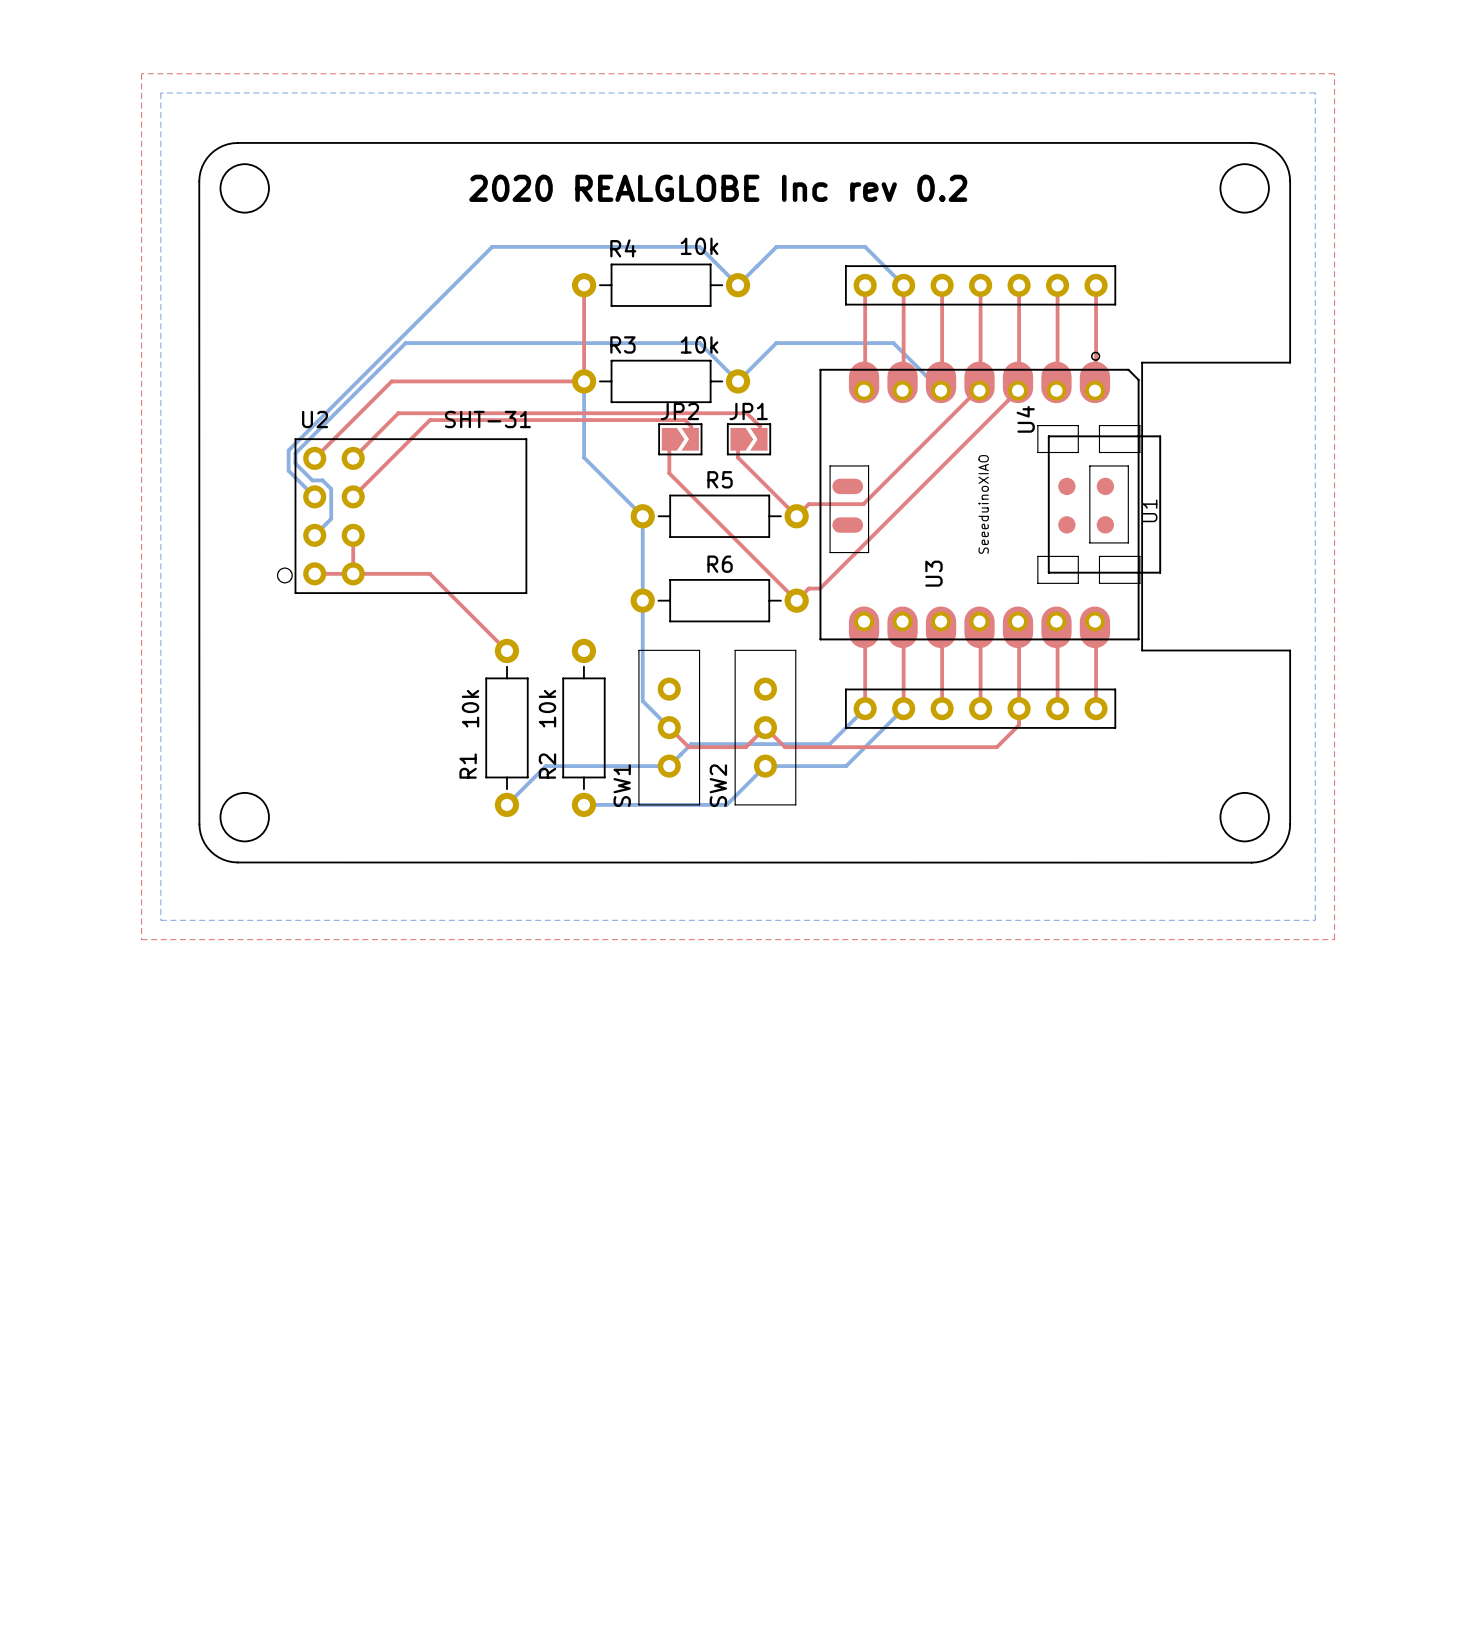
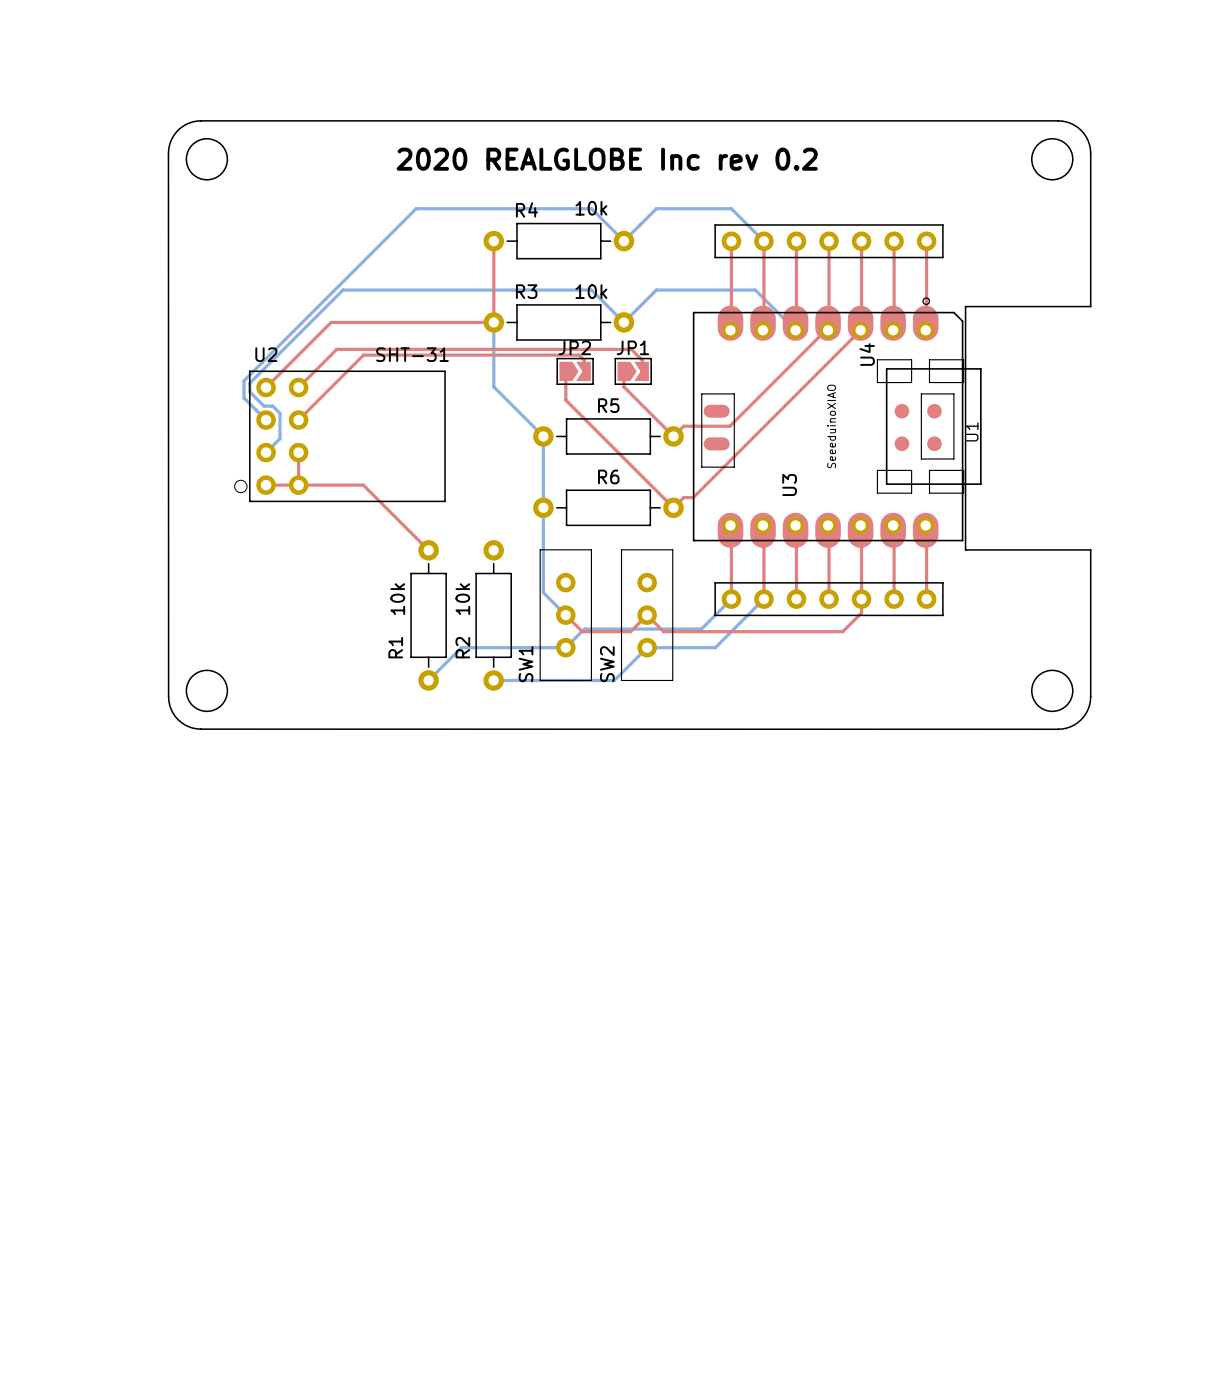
top zone outline: (141, 73) (1334, 73) (1334, 939) (141, 939) (141, 73) -> none
bottom zone outline: (160, 92) (1315, 92) (1315, 920) (160, 920) (160, 92) -> none

